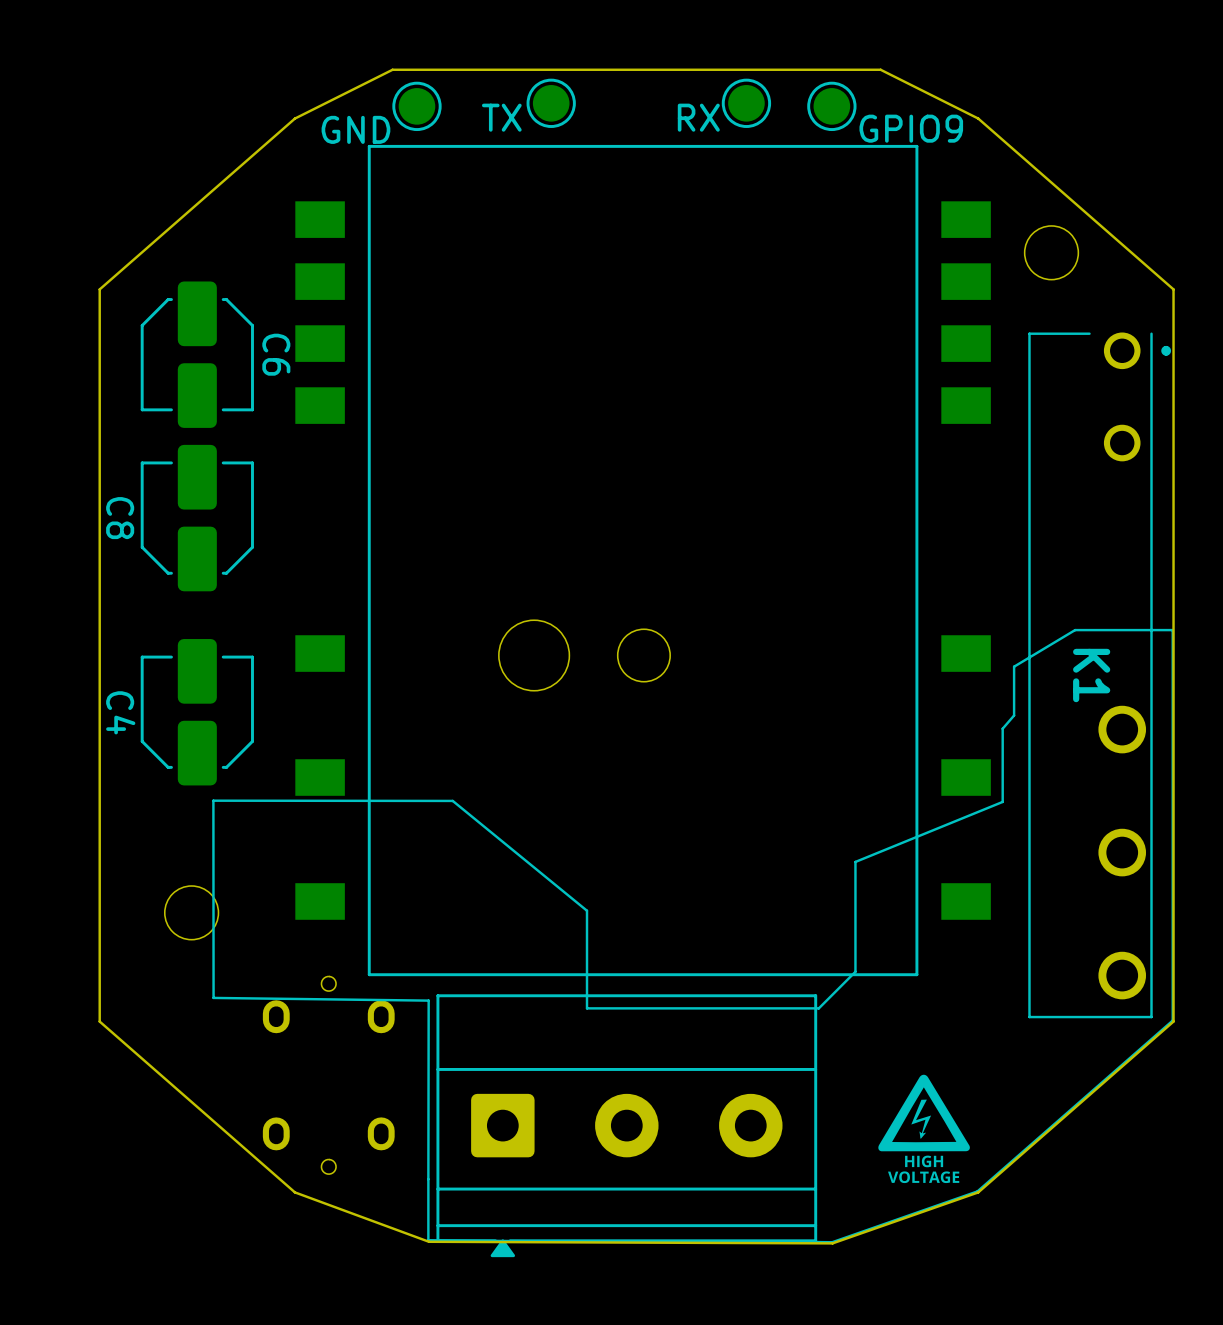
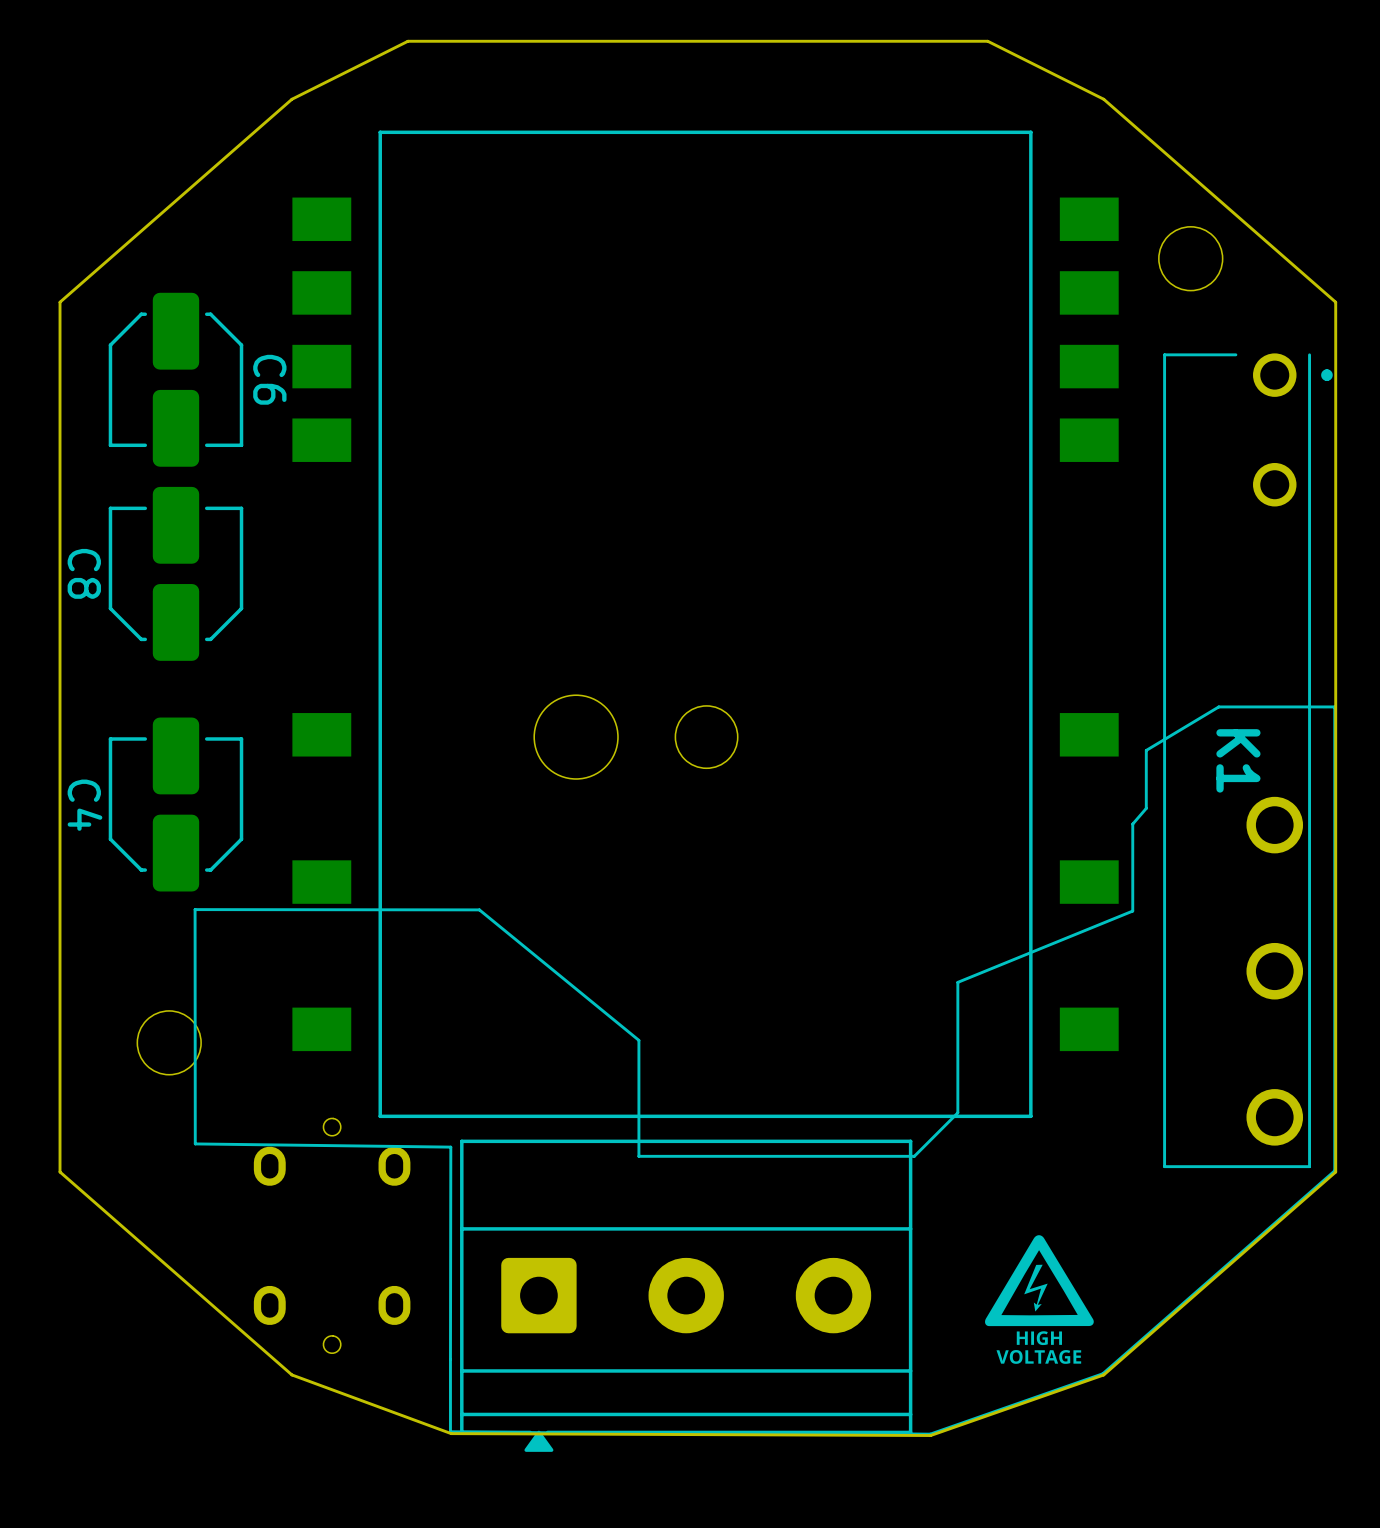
part: TX (551, 103) -> none
part: RX (746, 103) -> none
part: GND (416, 106) -> none
part: GPIO9 (831, 106) -> none

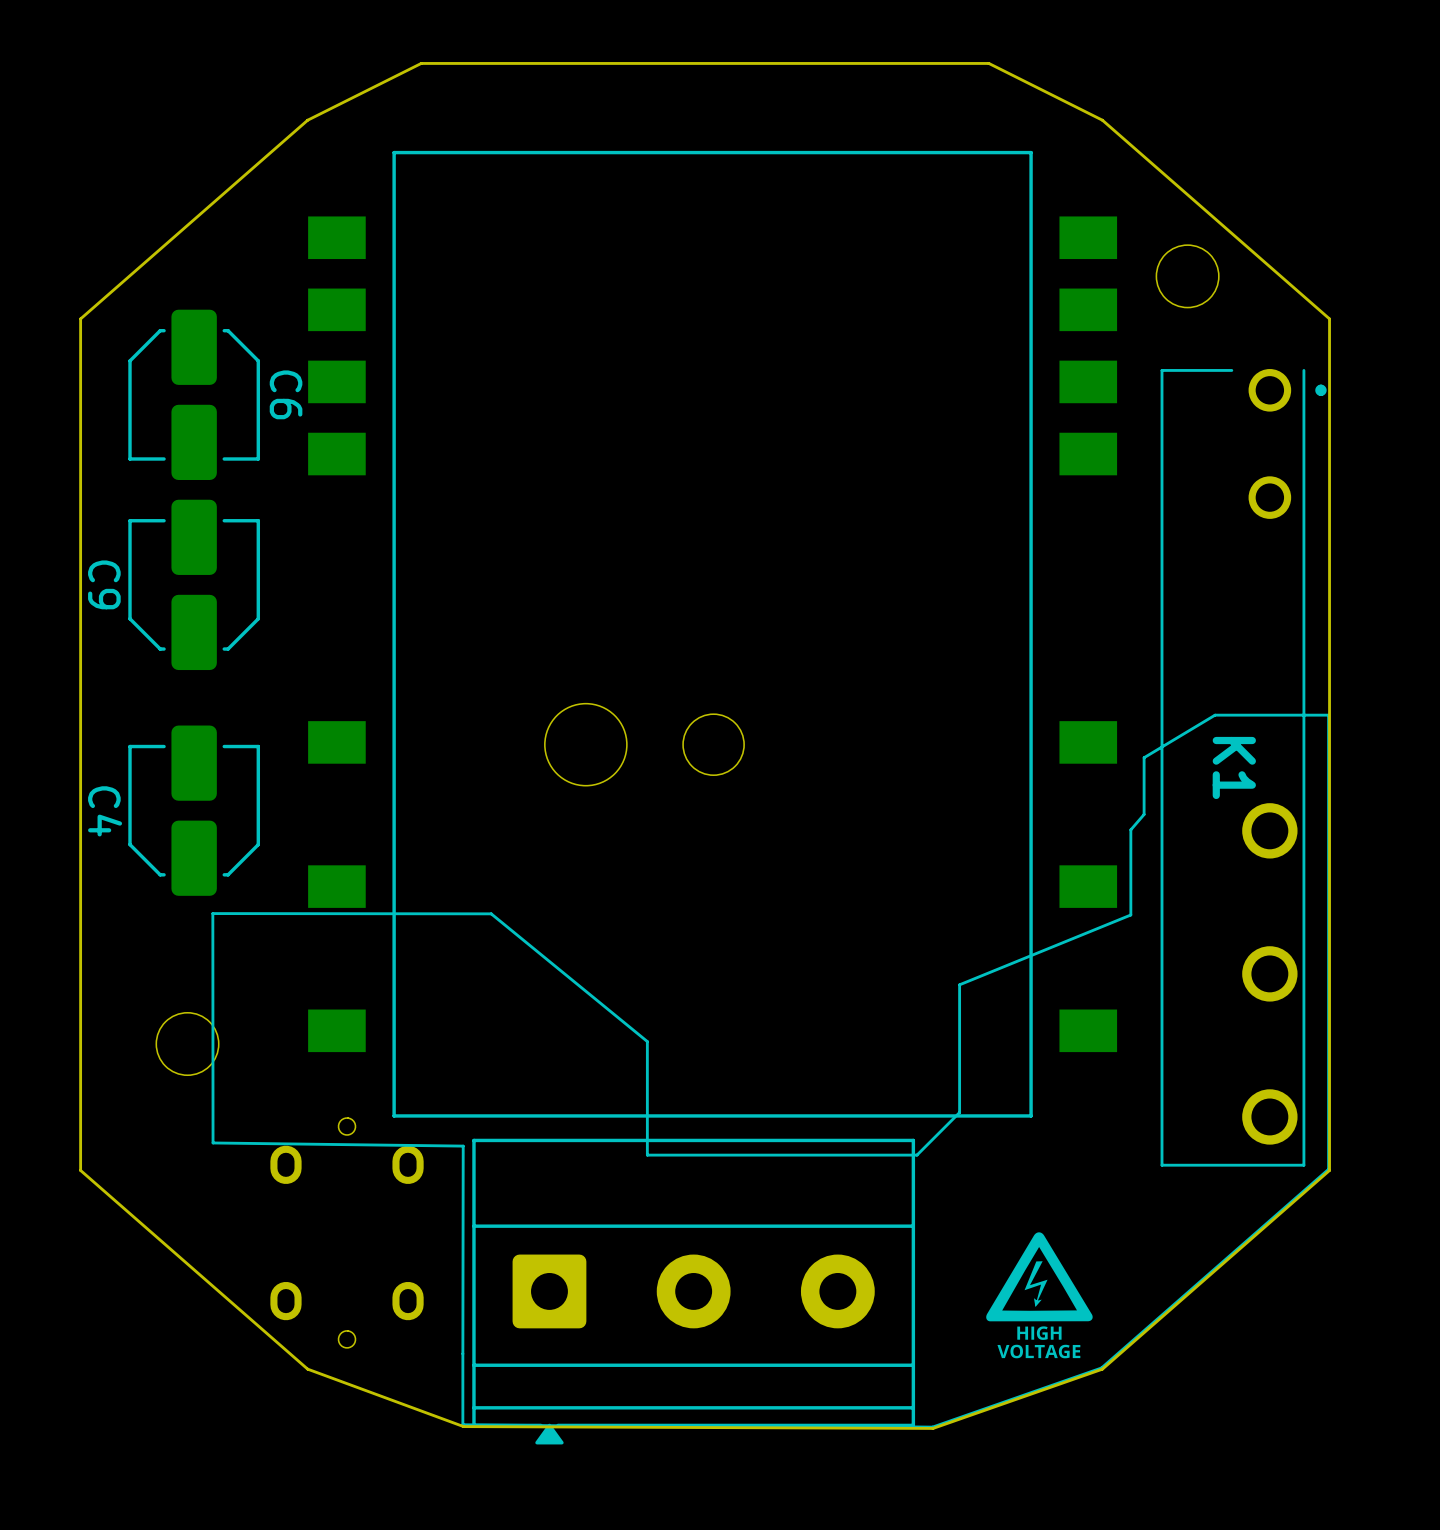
C8 name: C8 (84, 573) -> C9 (104, 584)

